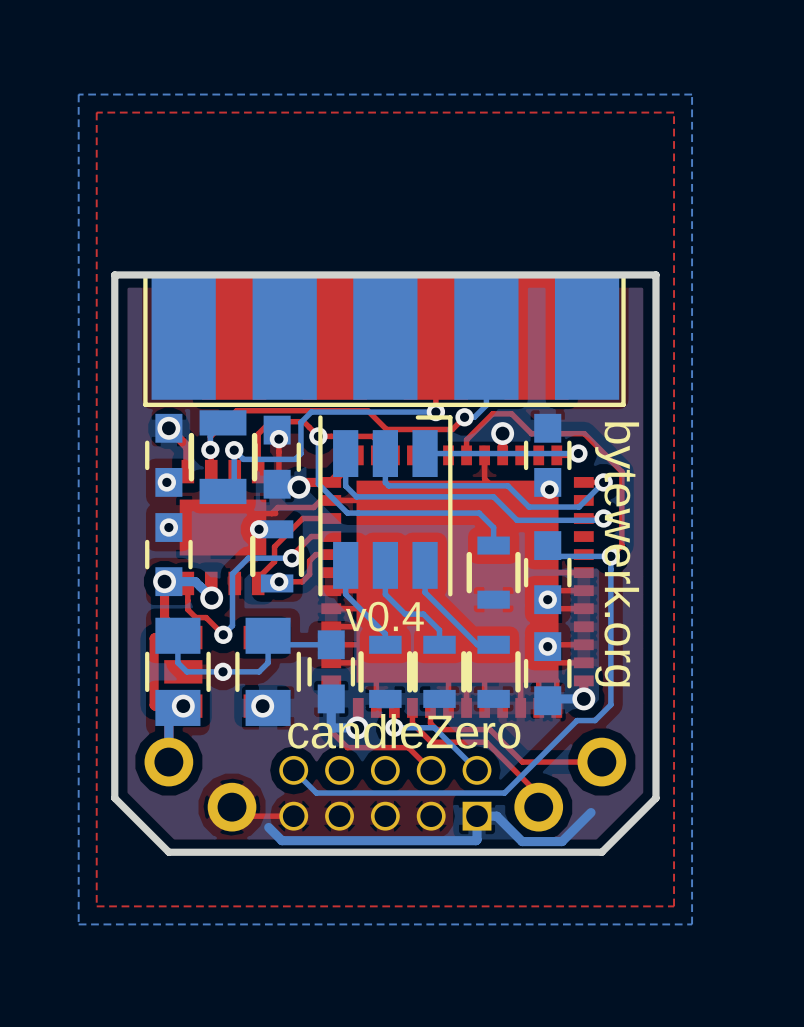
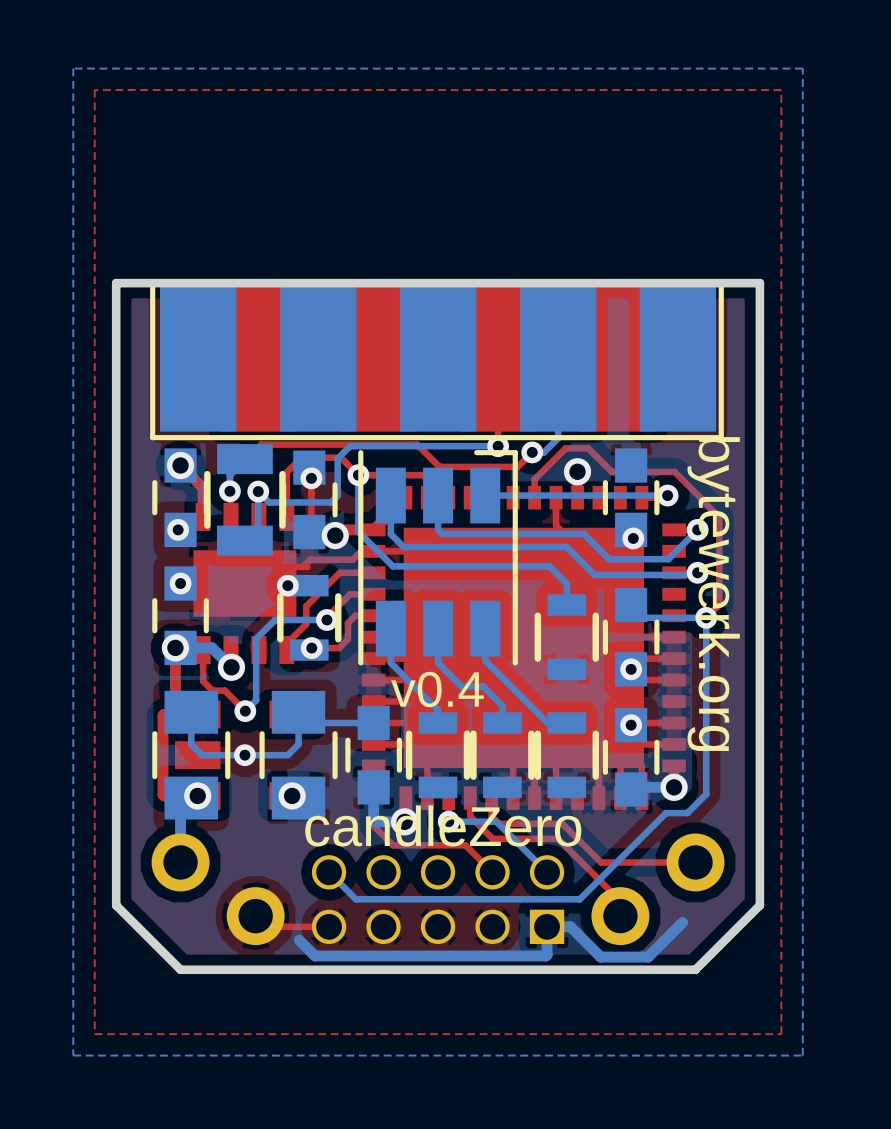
text position: bytewerk.org (617, 554) -> bytewerk.org (713, 594)
text position: candleZero (404, 731) -> candleZero (443, 825)

